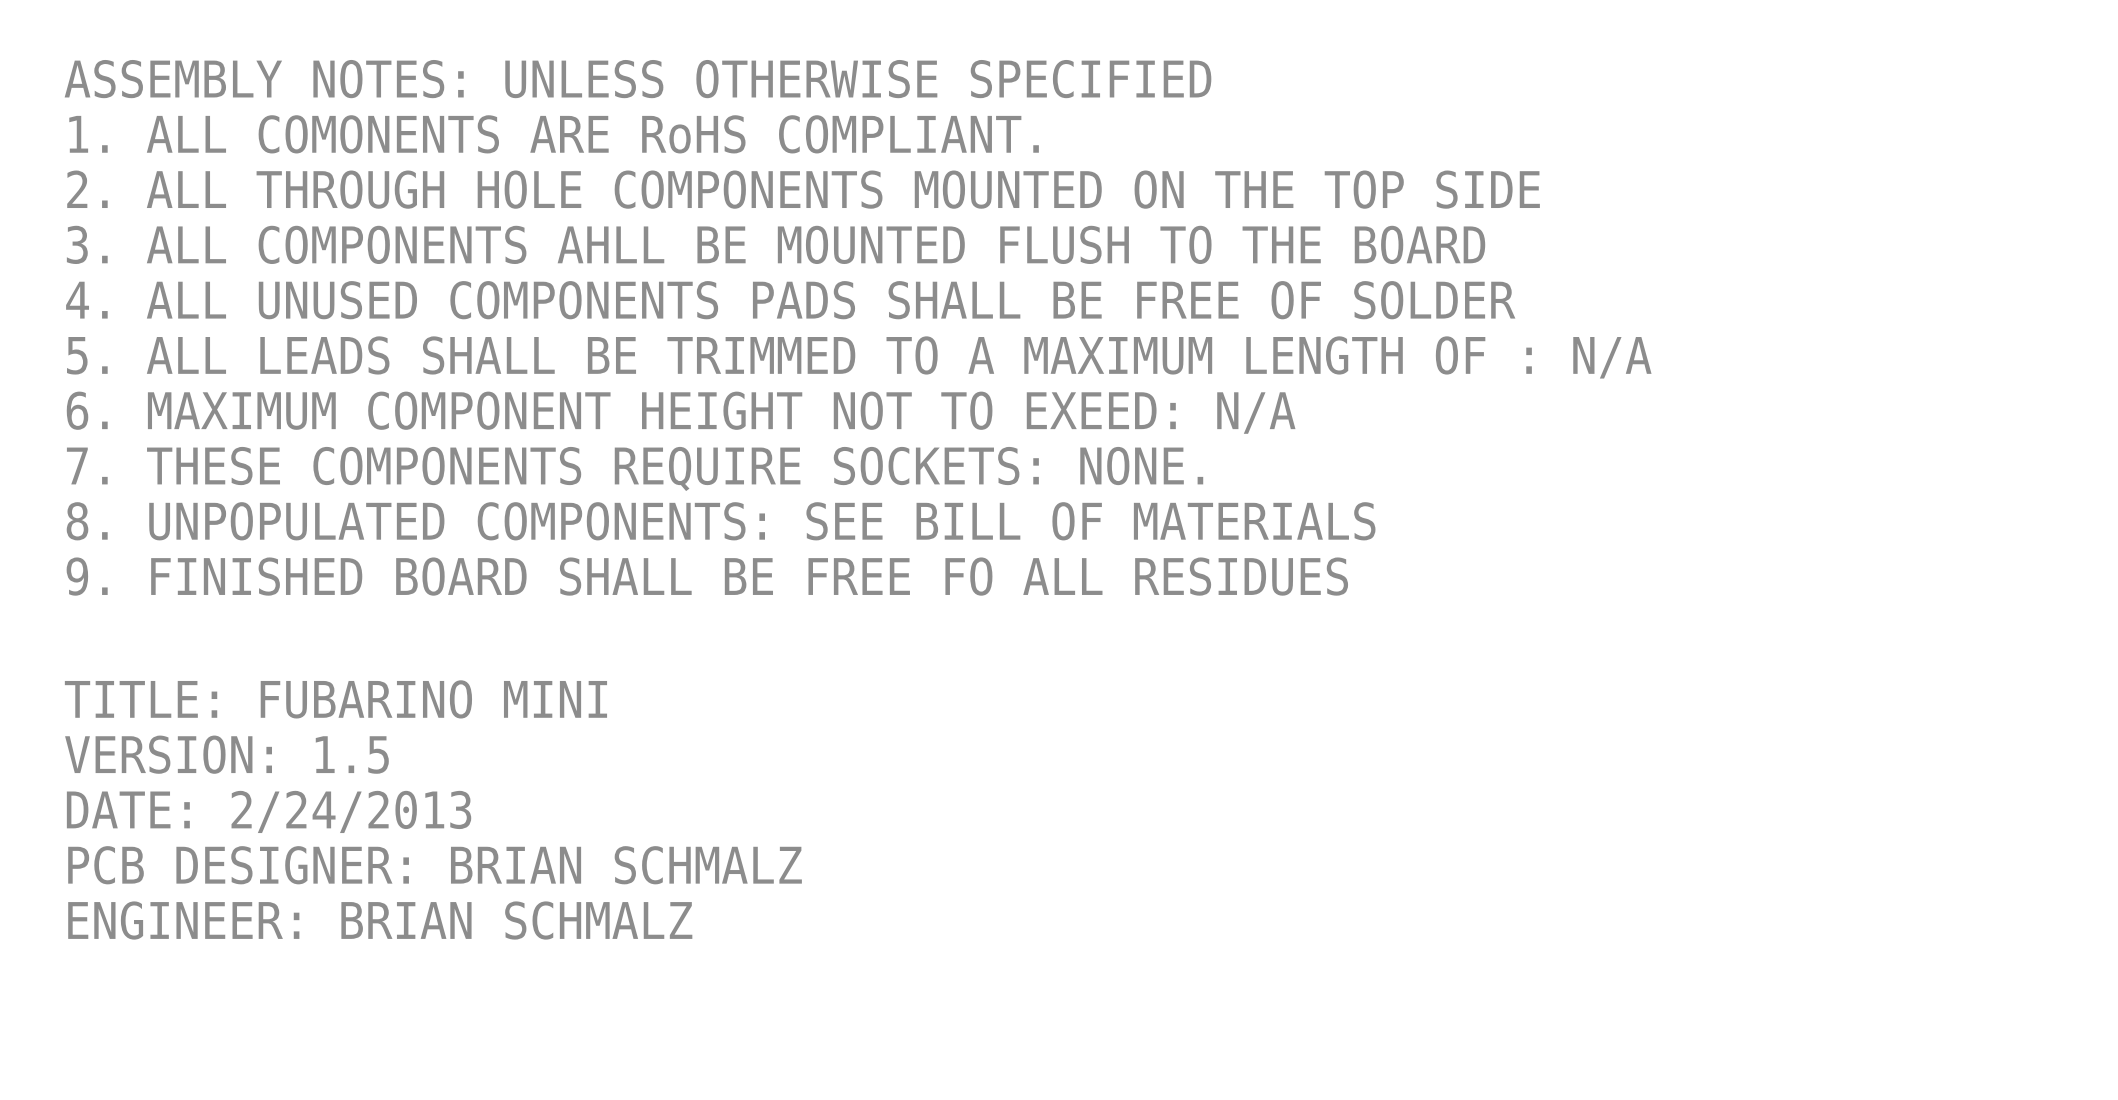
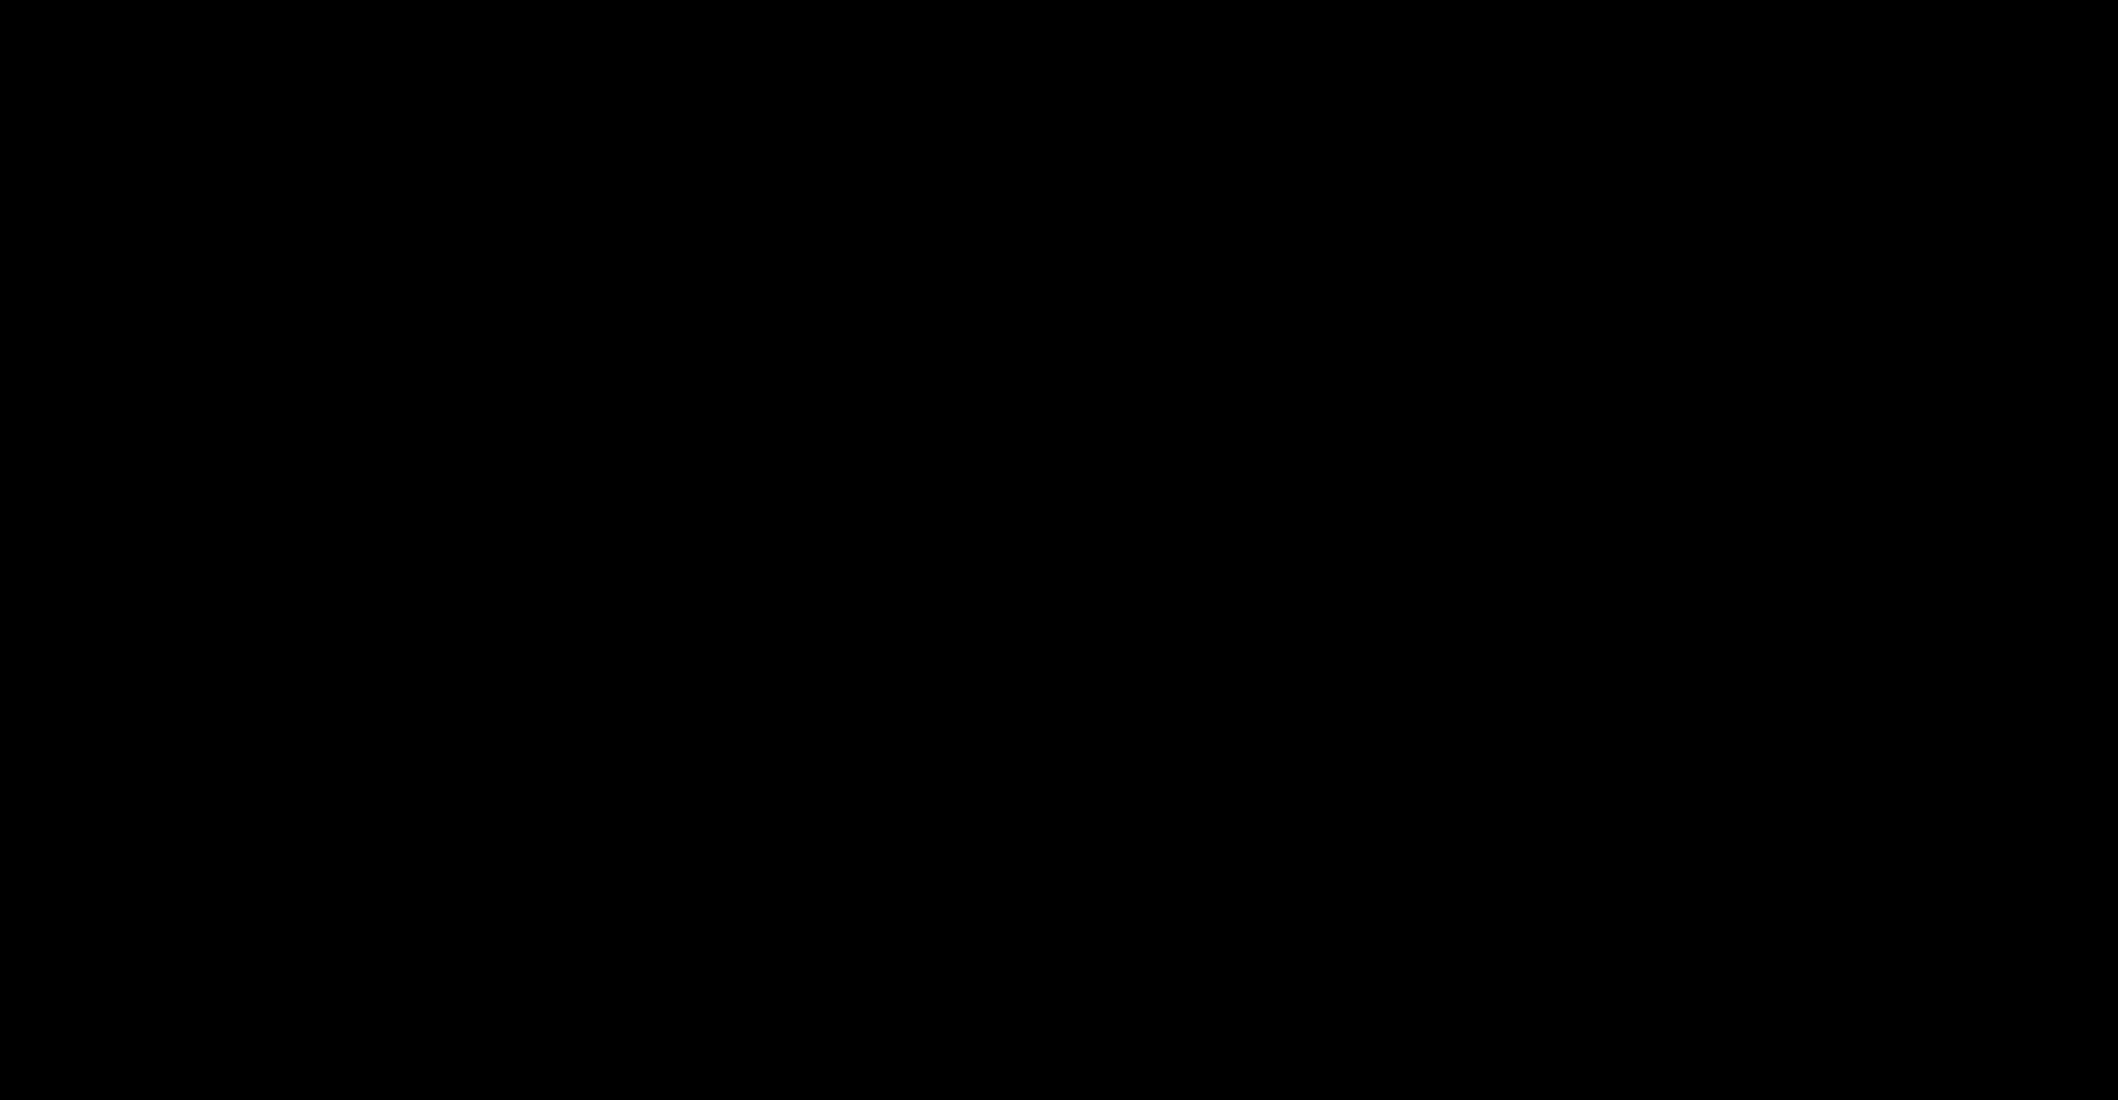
text: ASSEMBLY NOTES: UNLESS OTHERWISE SPECIFIED (637, 79) -> none
text: 1. ALL COMONENTS ARE RoHS COMPLIANT. (554, 134) -> none
text: 2. ALL THROUGH HOLE COMPONENTS MOUNTED ON THE TOP SIDE (803, 189) -> none
text: 3. ALL COMPONENTS AHLL BE MOUNTED FLUSH TO THE BOARD (776, 244) -> none
text: 4. ALL UNUSED COMPONENTS PADS SHALL BE FREE OF SOLDER (790, 300) -> none
text: 5. ALL LEADS SHALL BE TRIMMED TO A MAXIMUM LENGTH OF : N/A (859, 357) -> none
text: 6. MAXIMUM COMPONENT HEIGHT NOT TO EXEED: N/A (681, 412) -> none
text: 7. THESE COMPONENTS REQUIRE SOCKETS: NONE. (635, 468) -> none
text: 8. UNPOPULATED COMPONENTS: SEE BILL OF MATERIALS (721, 521) -> none
text: 9. FINISHED BOARD SHALL BE FREE FO ALL RESIDUES (707, 576) -> none
text: TITLE: FUBARINO MINI (335, 699) -> none
text: VERSION: 1.5 (226, 754) -> none
text: DATE: 2/24/2013 (269, 811) -> none
text: PCB DESIGNER: BRIAN SCHMALZ (435, 865) -> none
text: ENGINEER: BRIAN SCHMALZ (380, 920) -> none

